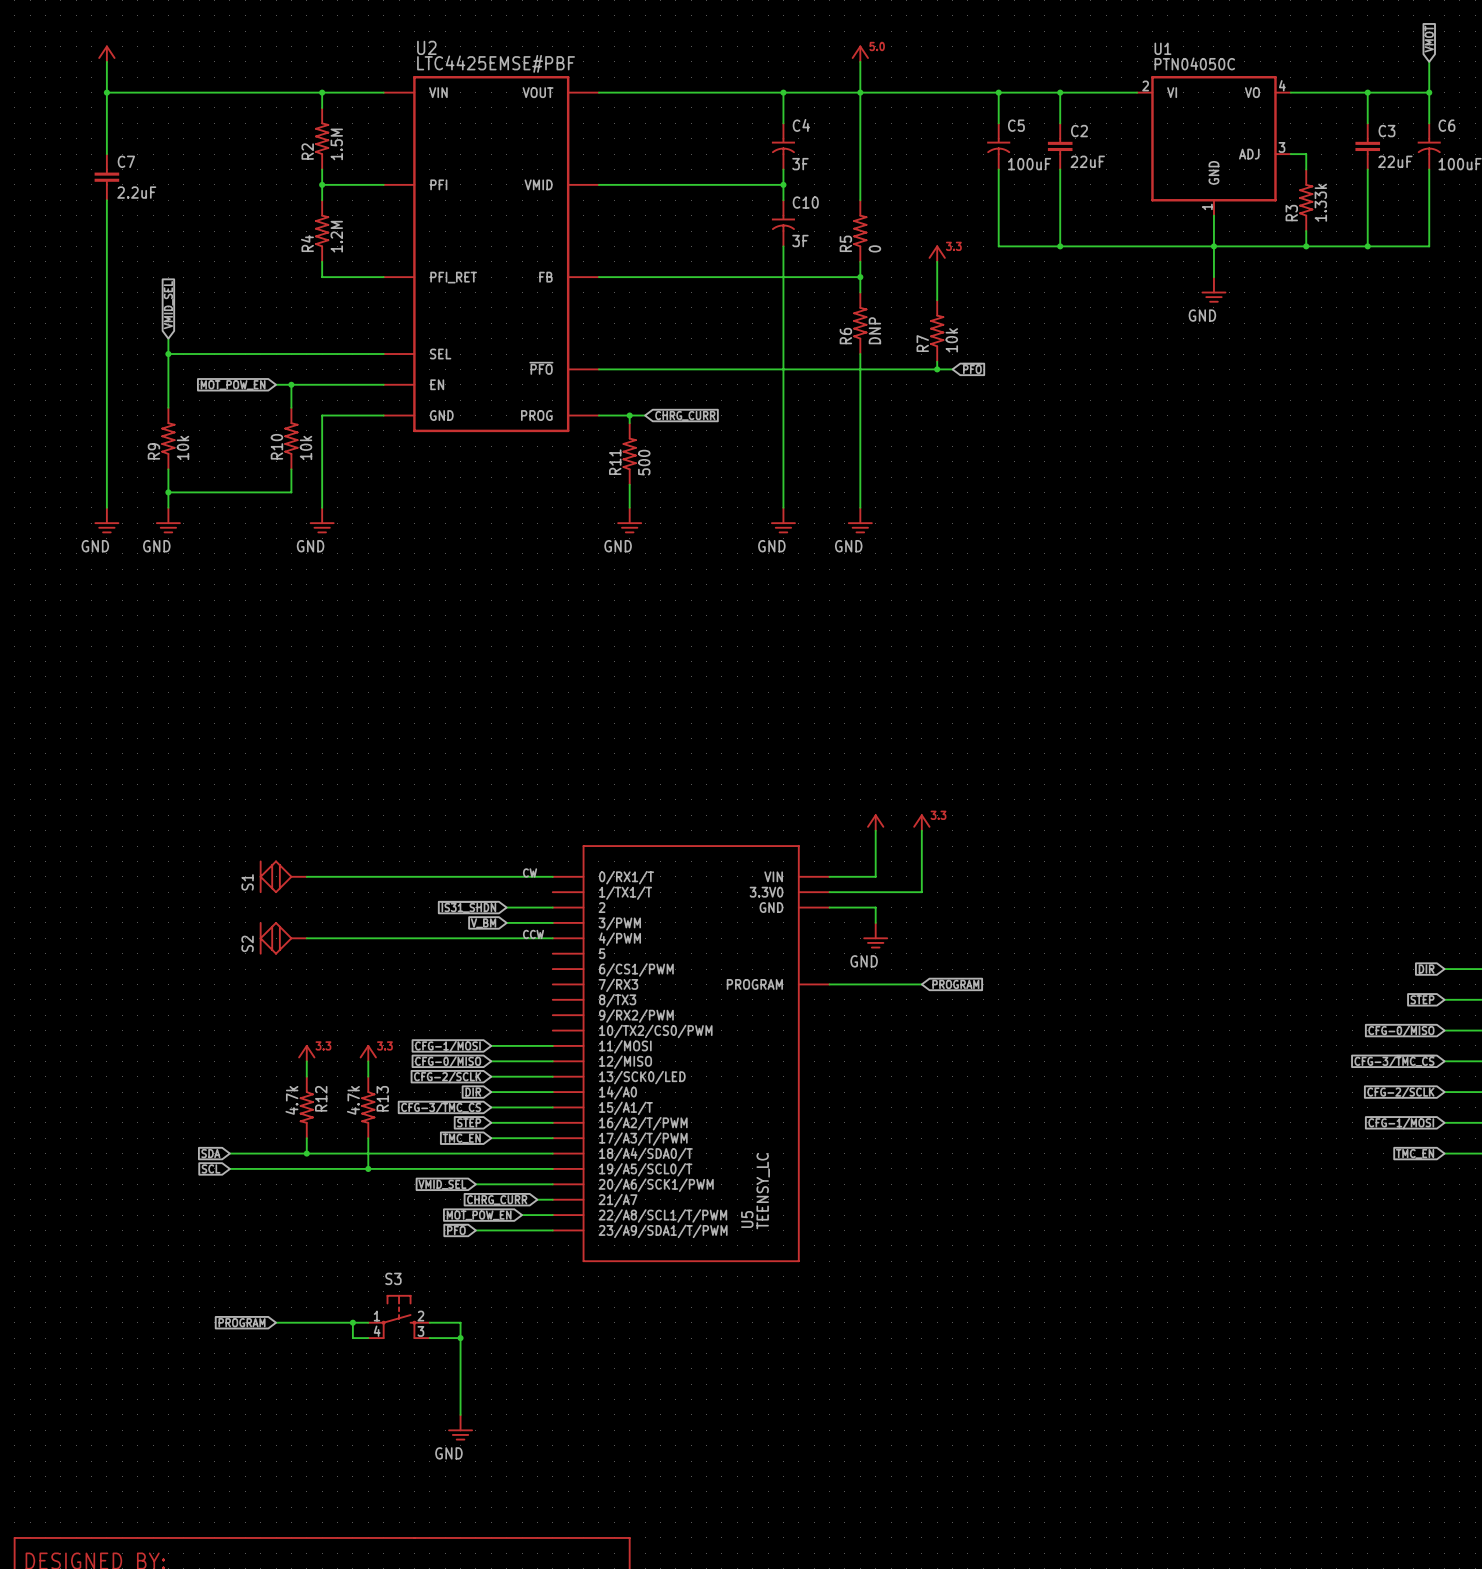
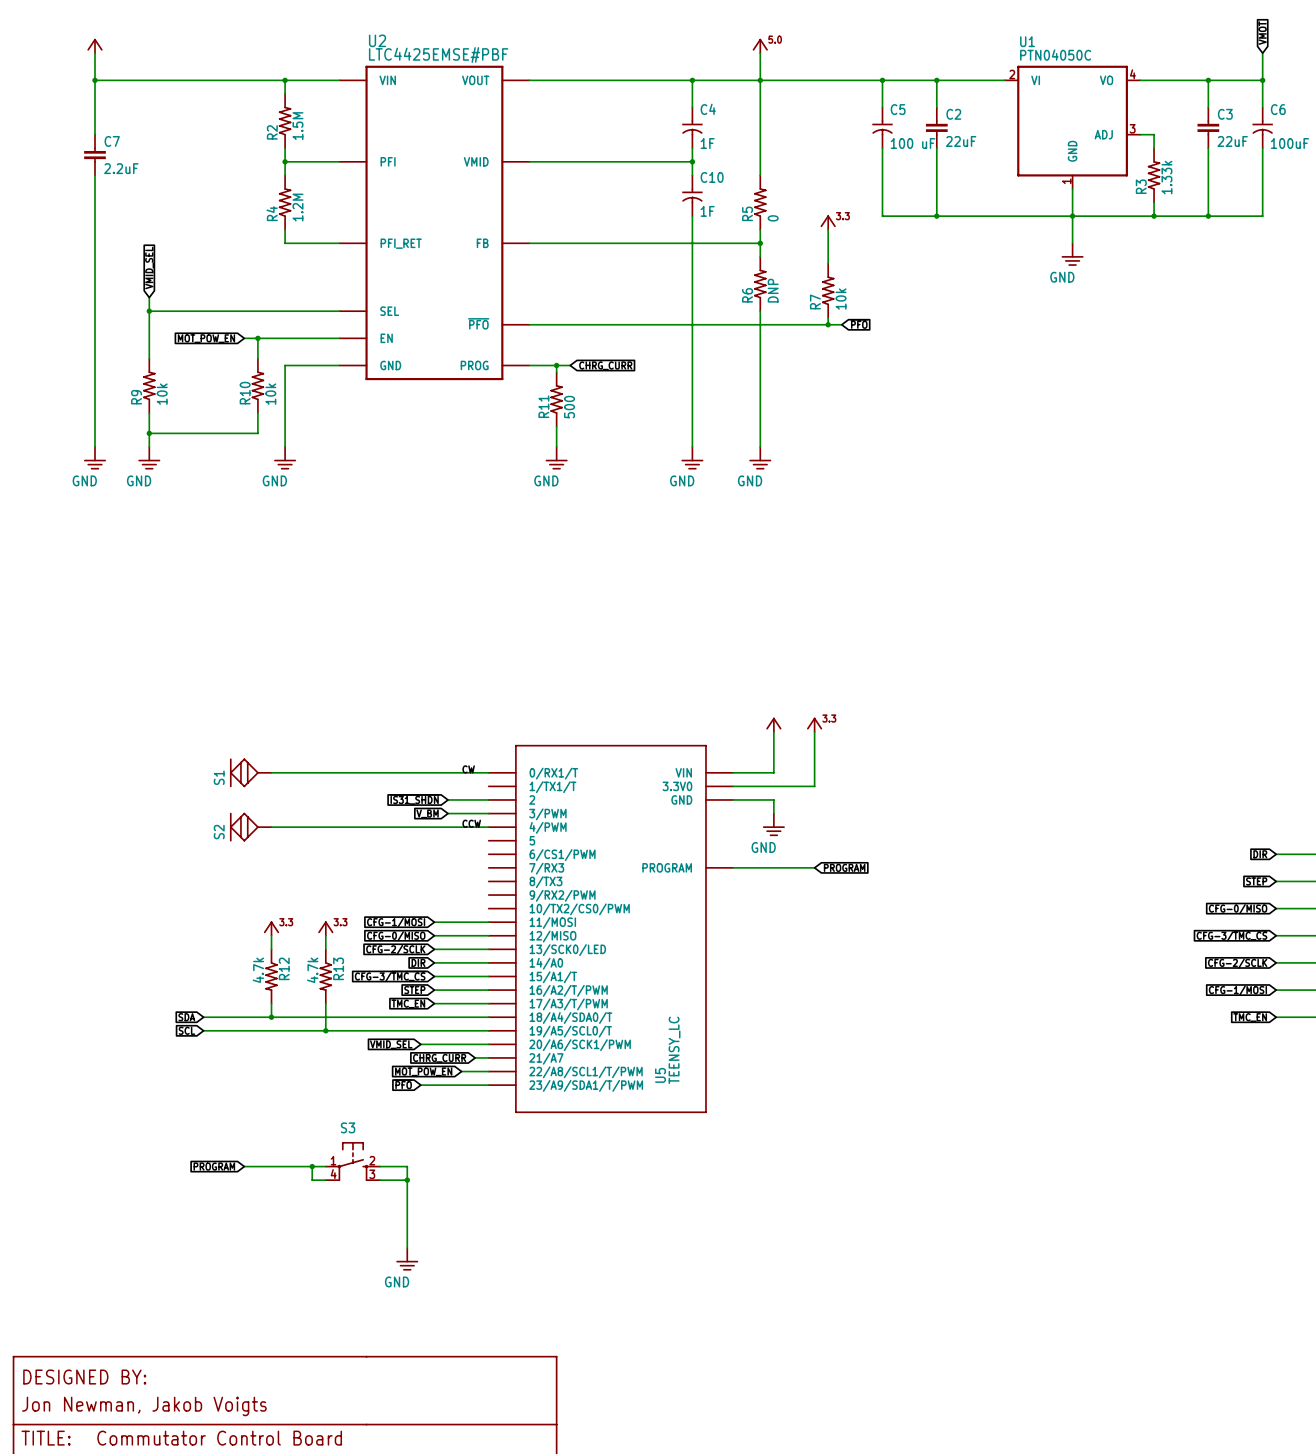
C4 value: 3F (800, 164) -> 1F (707, 143)
C5 value: 100uF (1029, 164) -> 100 uF (913, 143)
C10 value: 3F (800, 241) -> 1F (707, 211)

